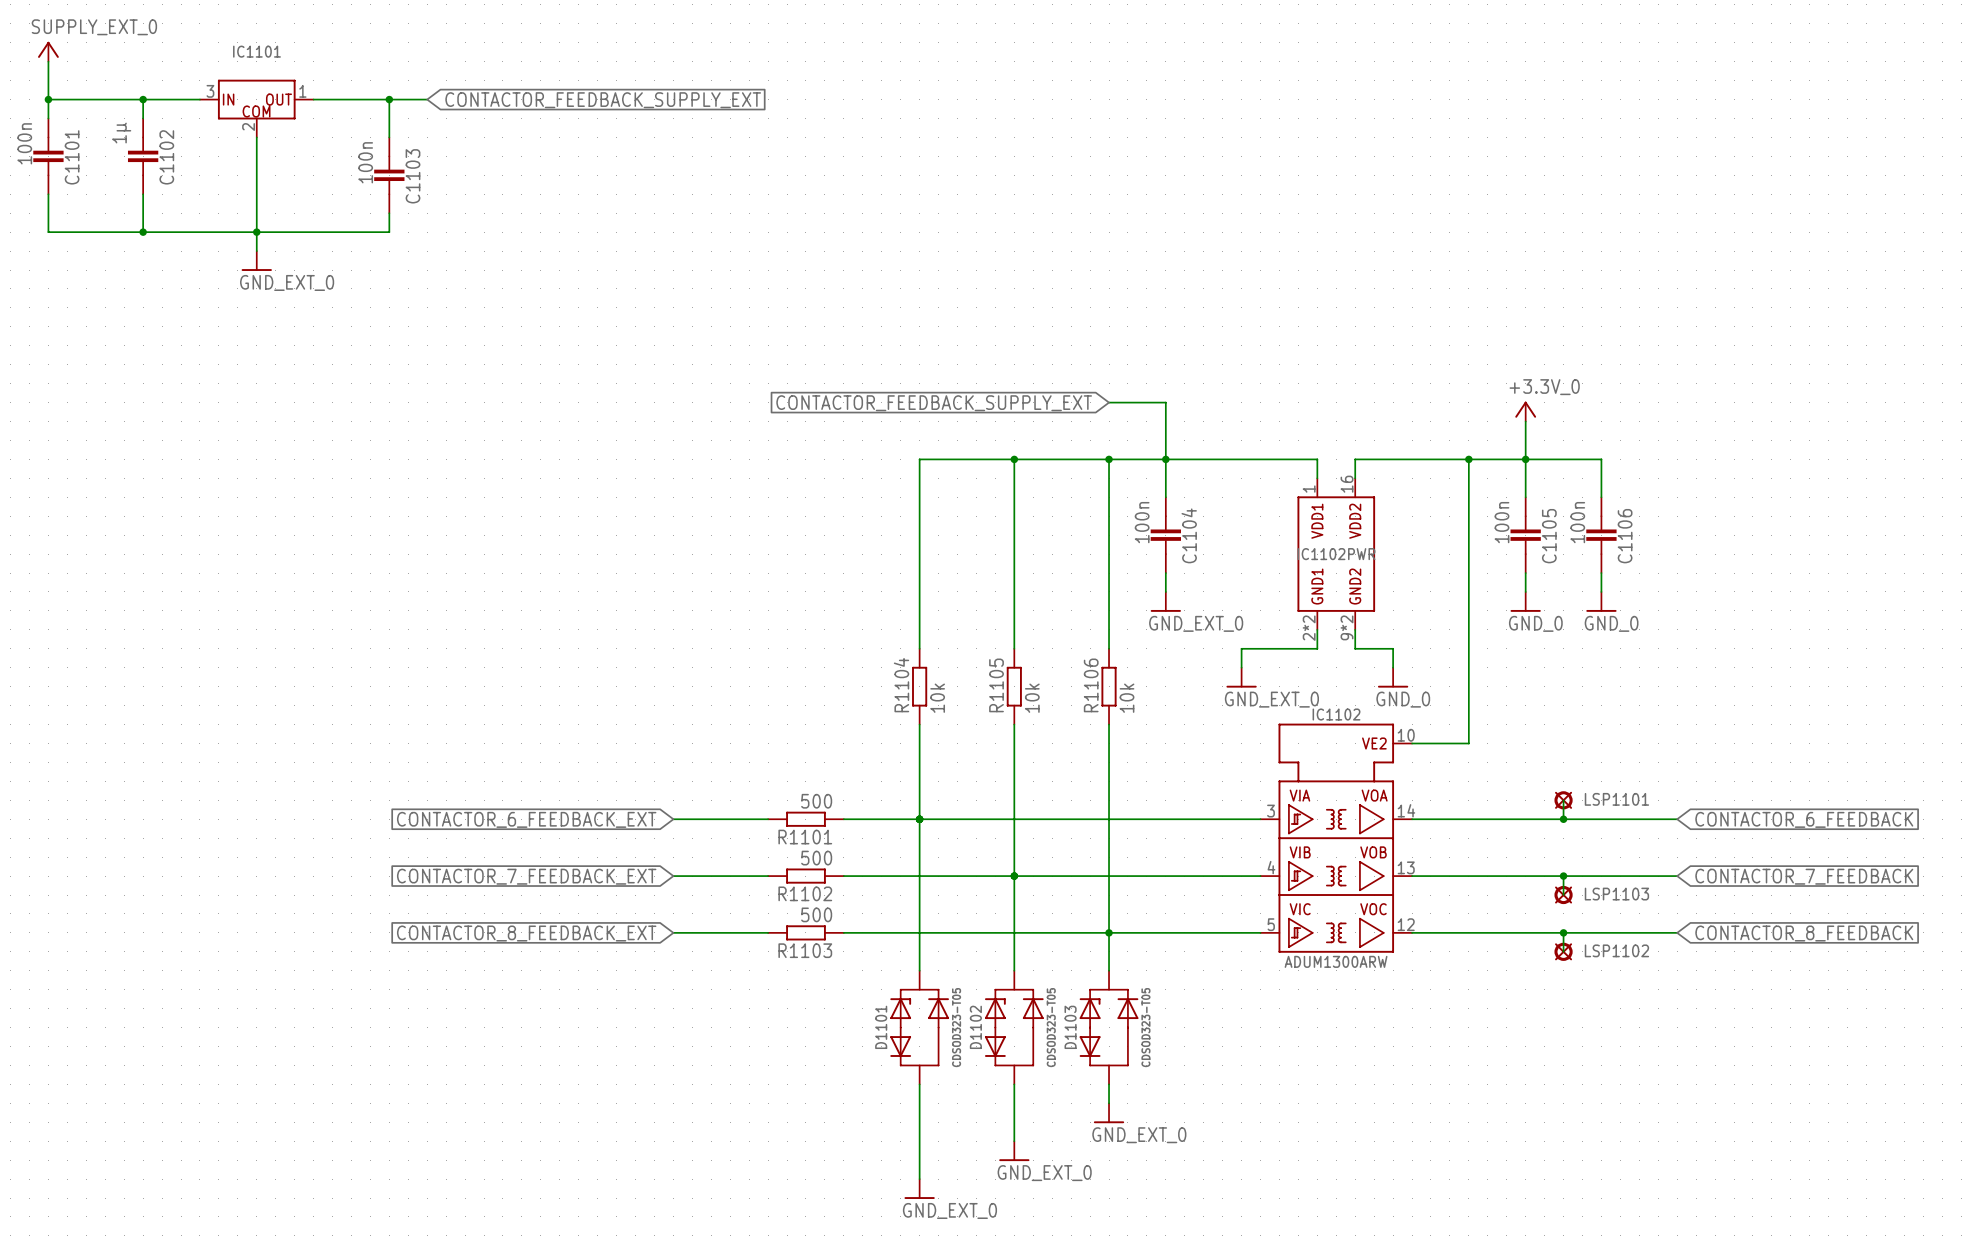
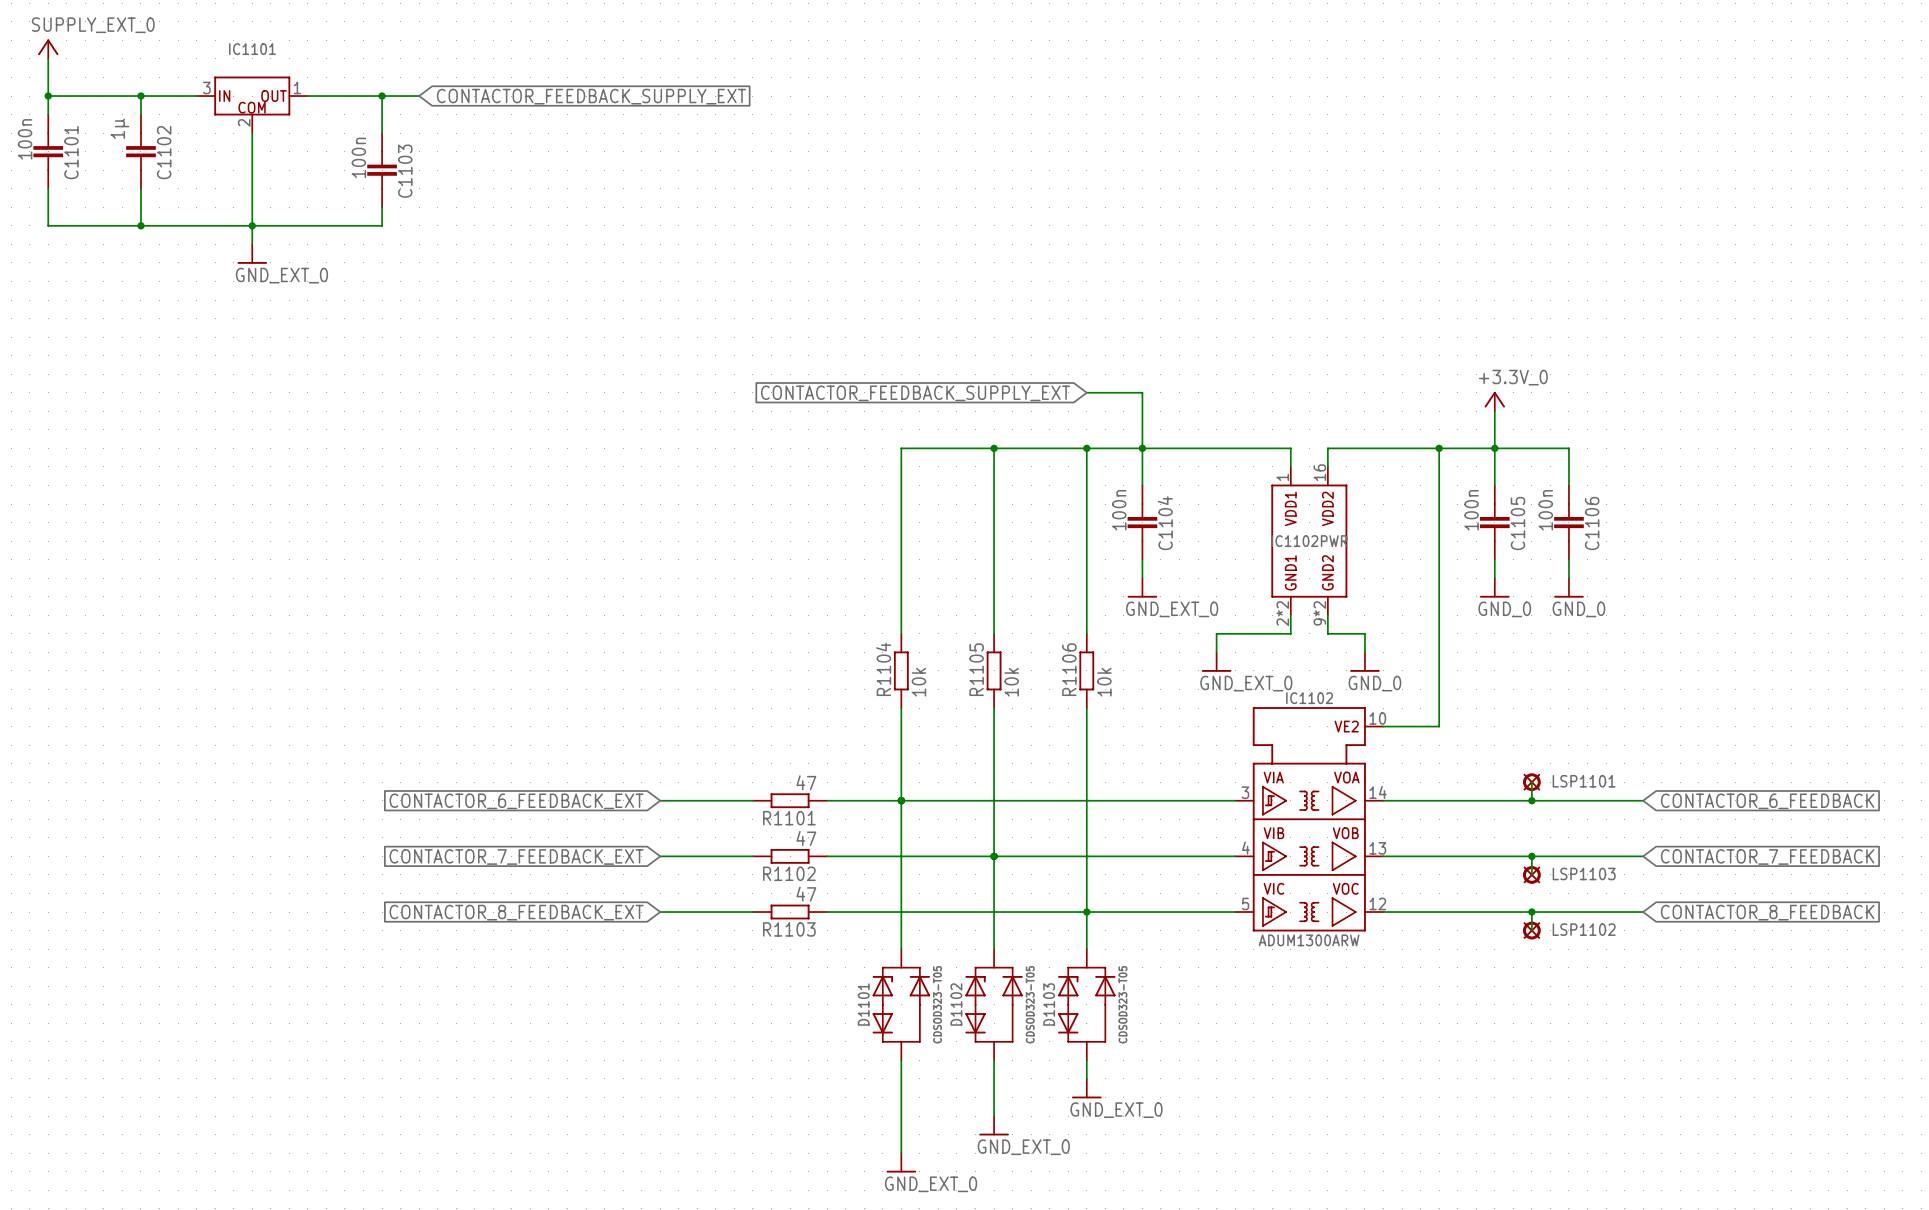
R1101 value: 500 (816, 801) -> 47 (806, 782)
R1102 value: 500 (816, 858) -> 47 (806, 838)
R1103 value: 500 (816, 914) -> 47 (806, 894)

